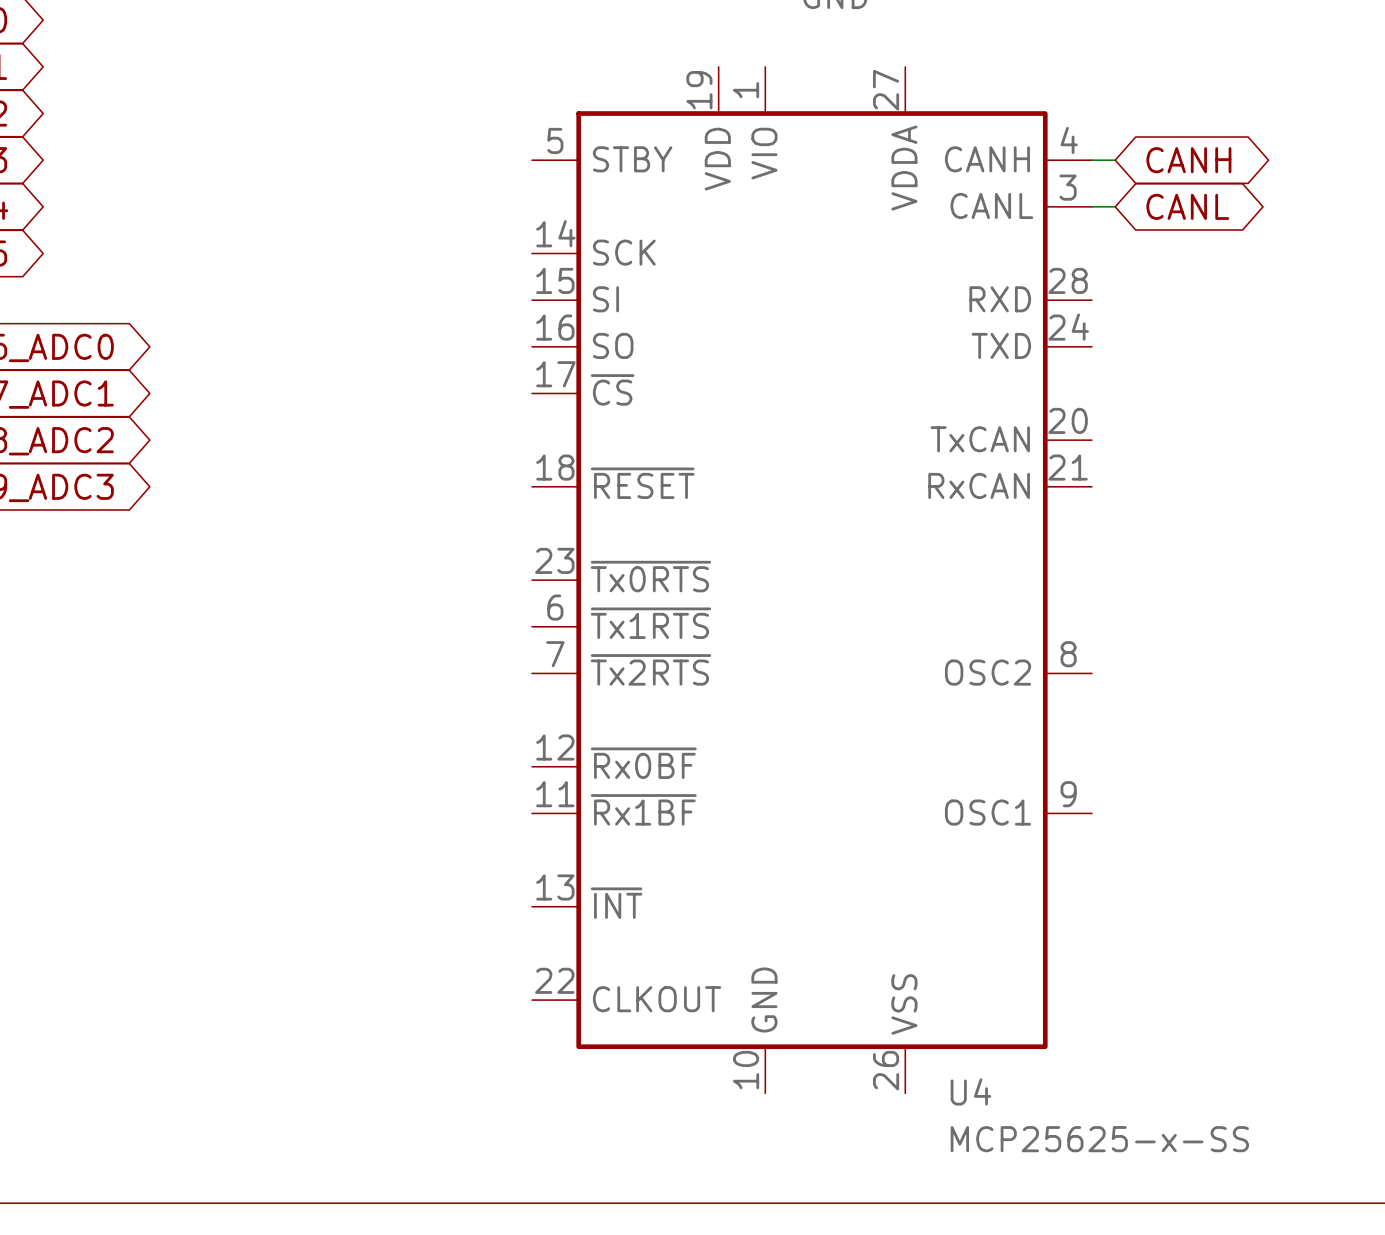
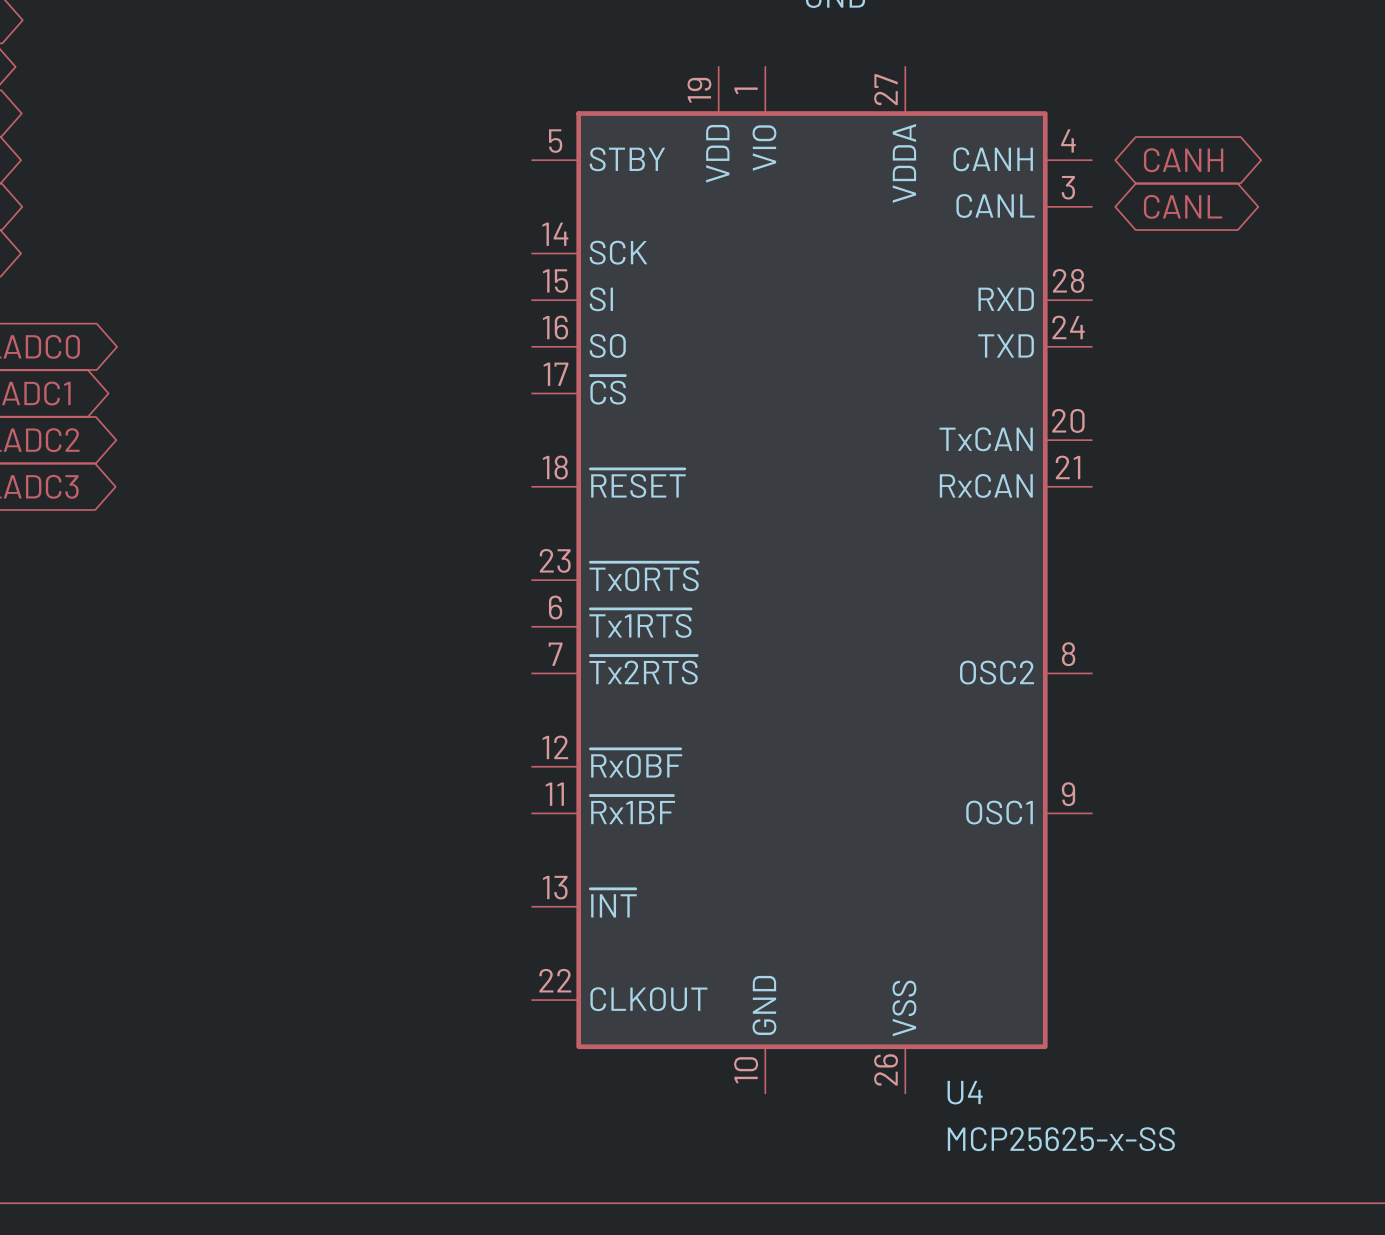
wire: (1091, 160) (1115, 160) -> none
wire: (1091, 206) (1115, 206) -> none

